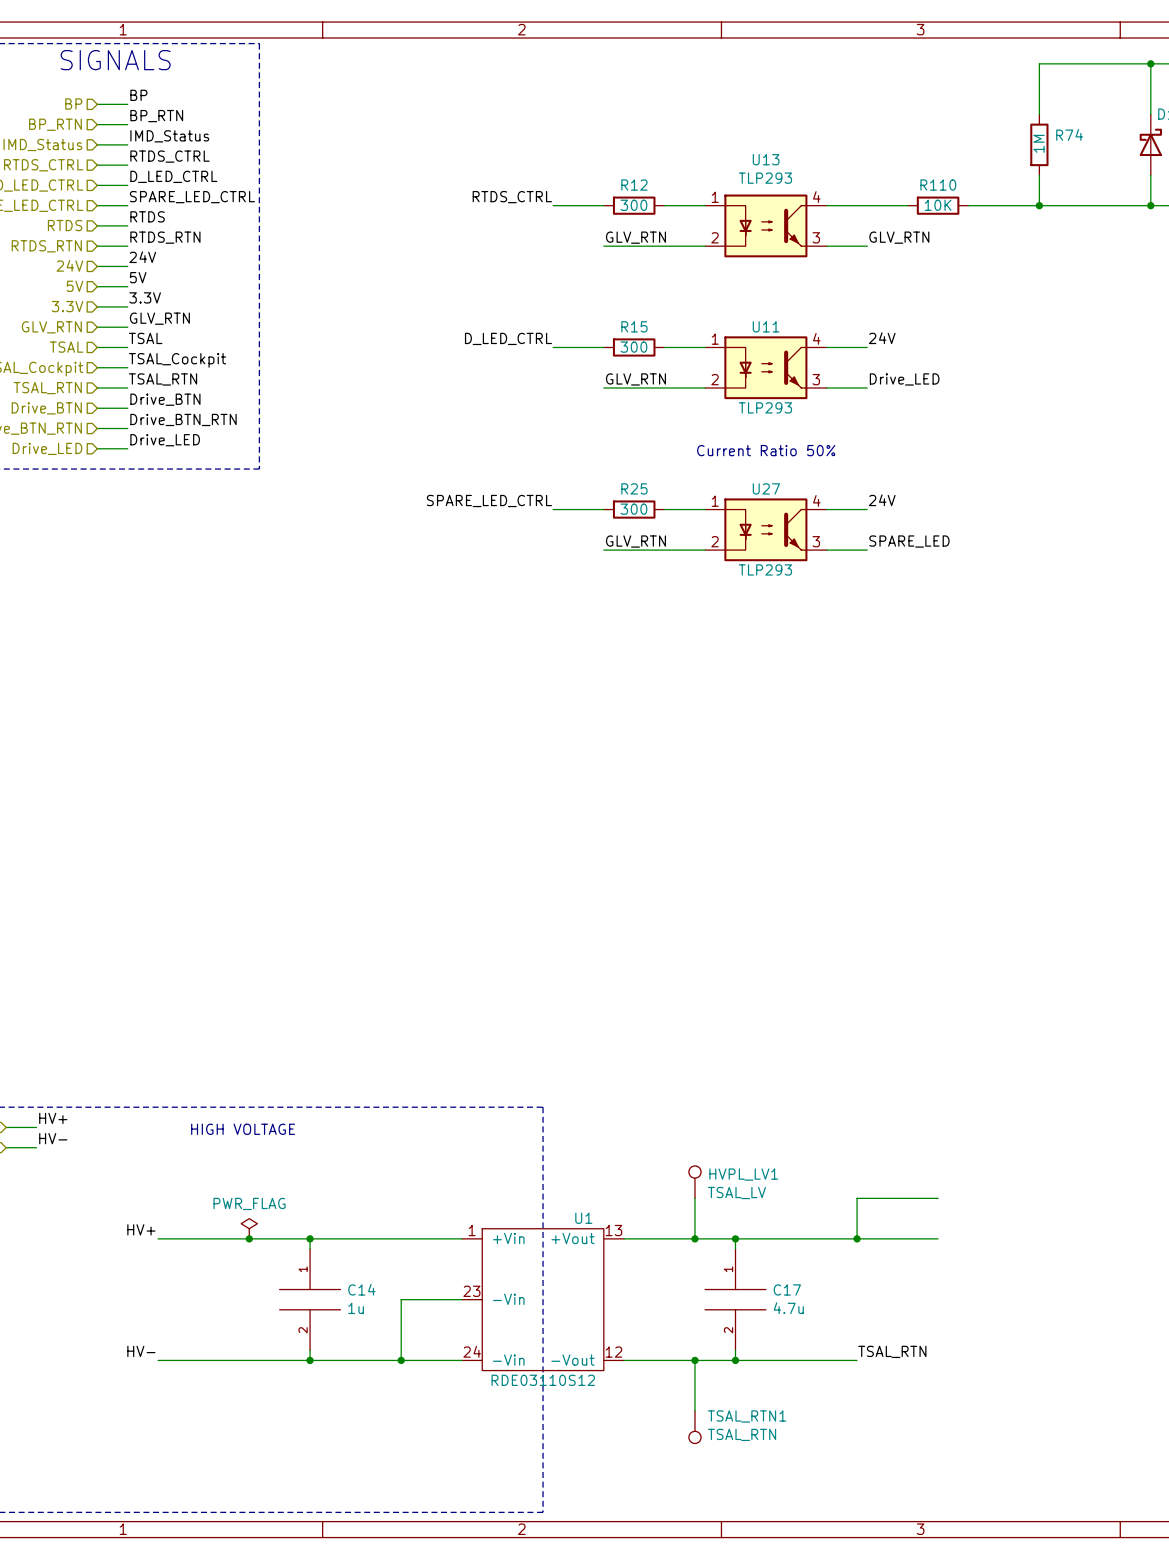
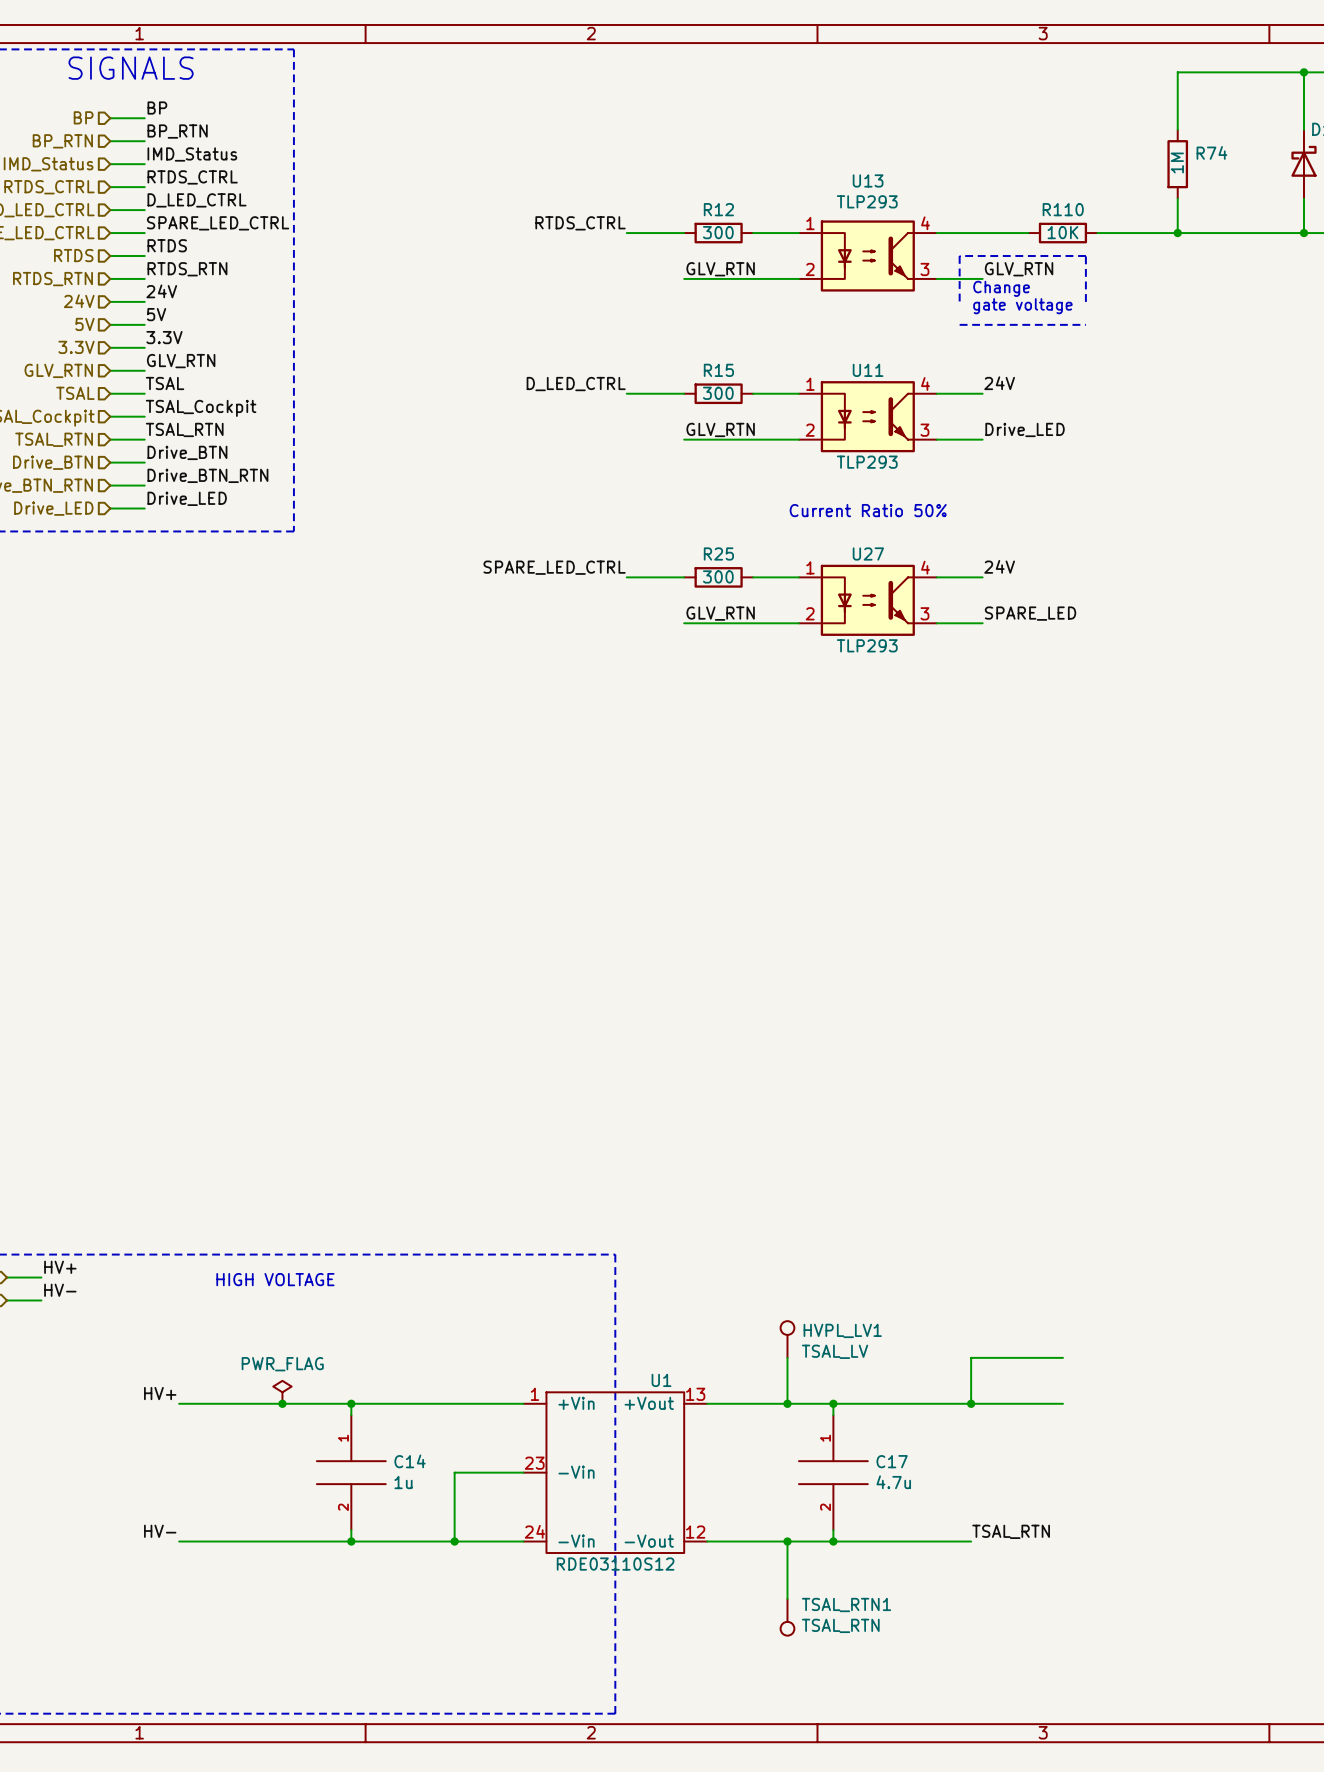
text: none -> Change (1001, 288)
line: none -> (959, 301) (959, 255) (1085, 255) (1085, 301)
text: none -> gate voltage (1022, 306)
line: none -> (959, 324) (1085, 324)

